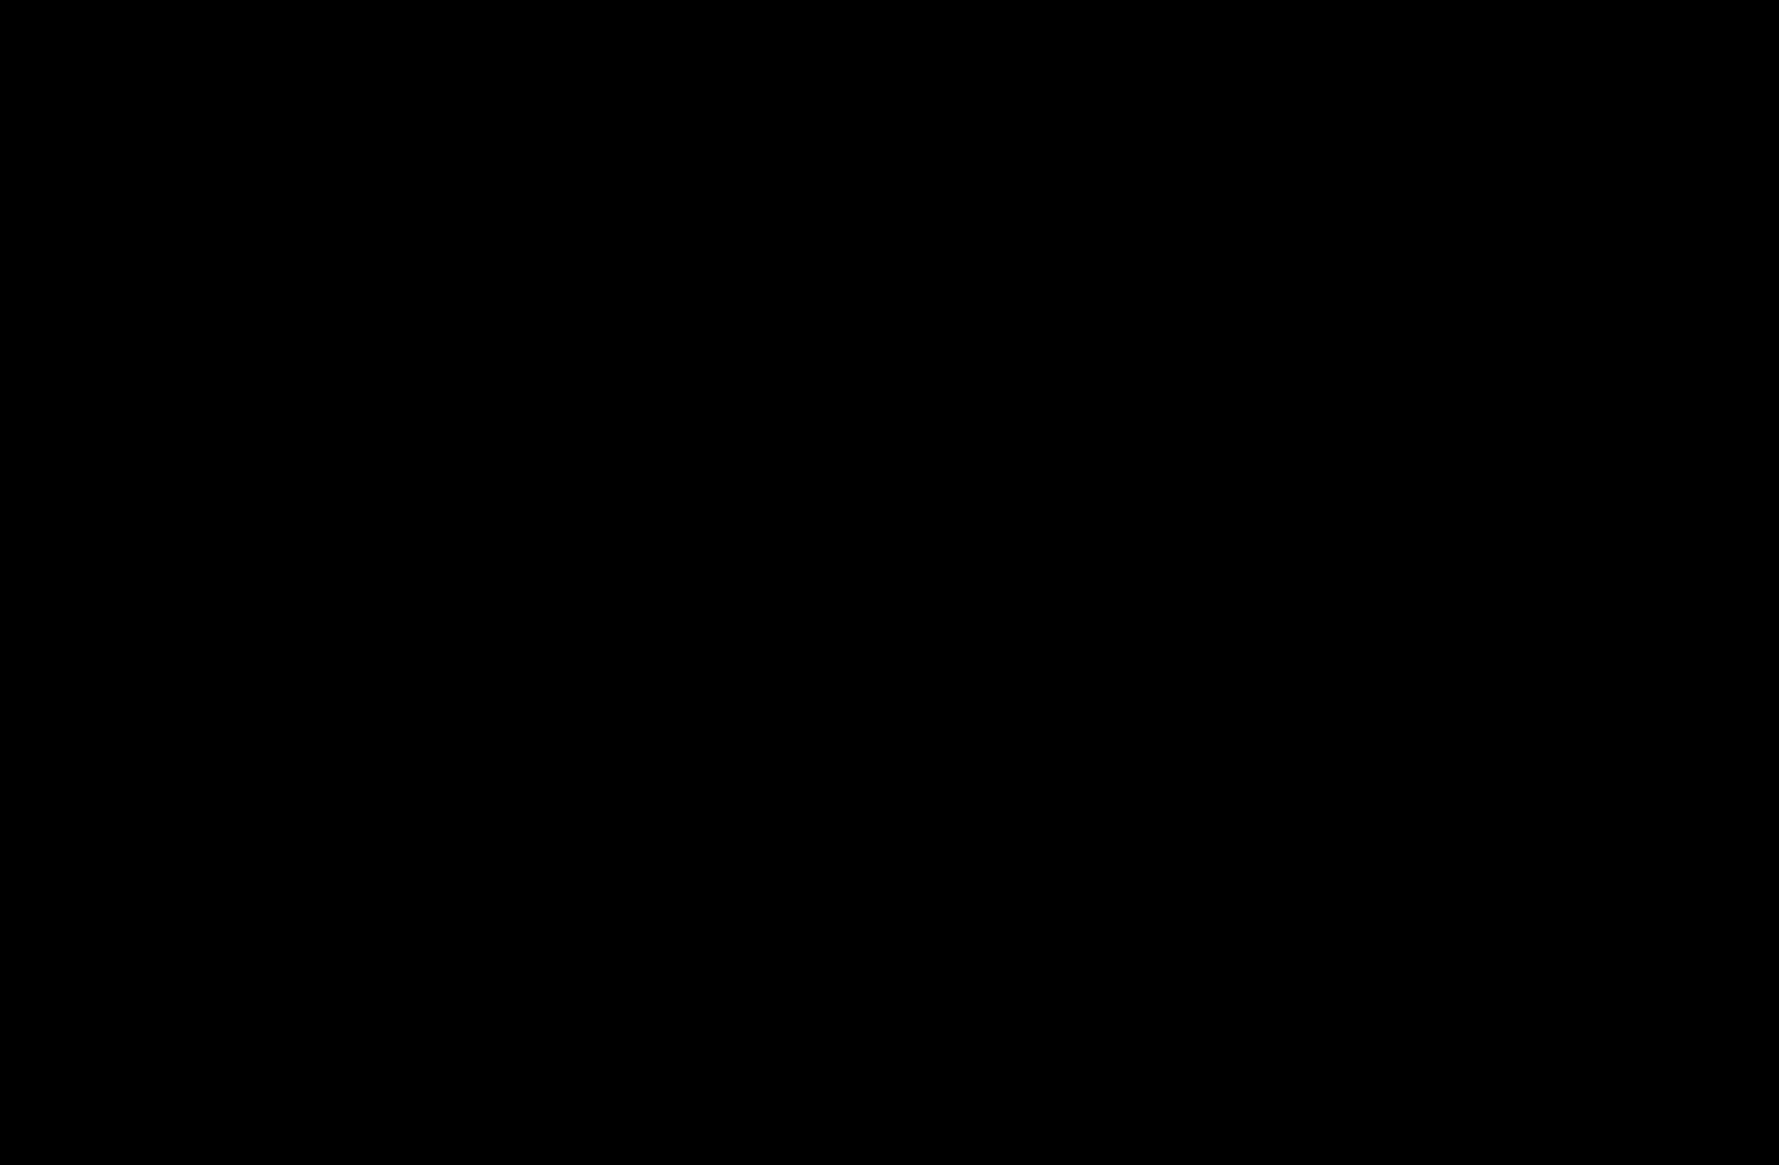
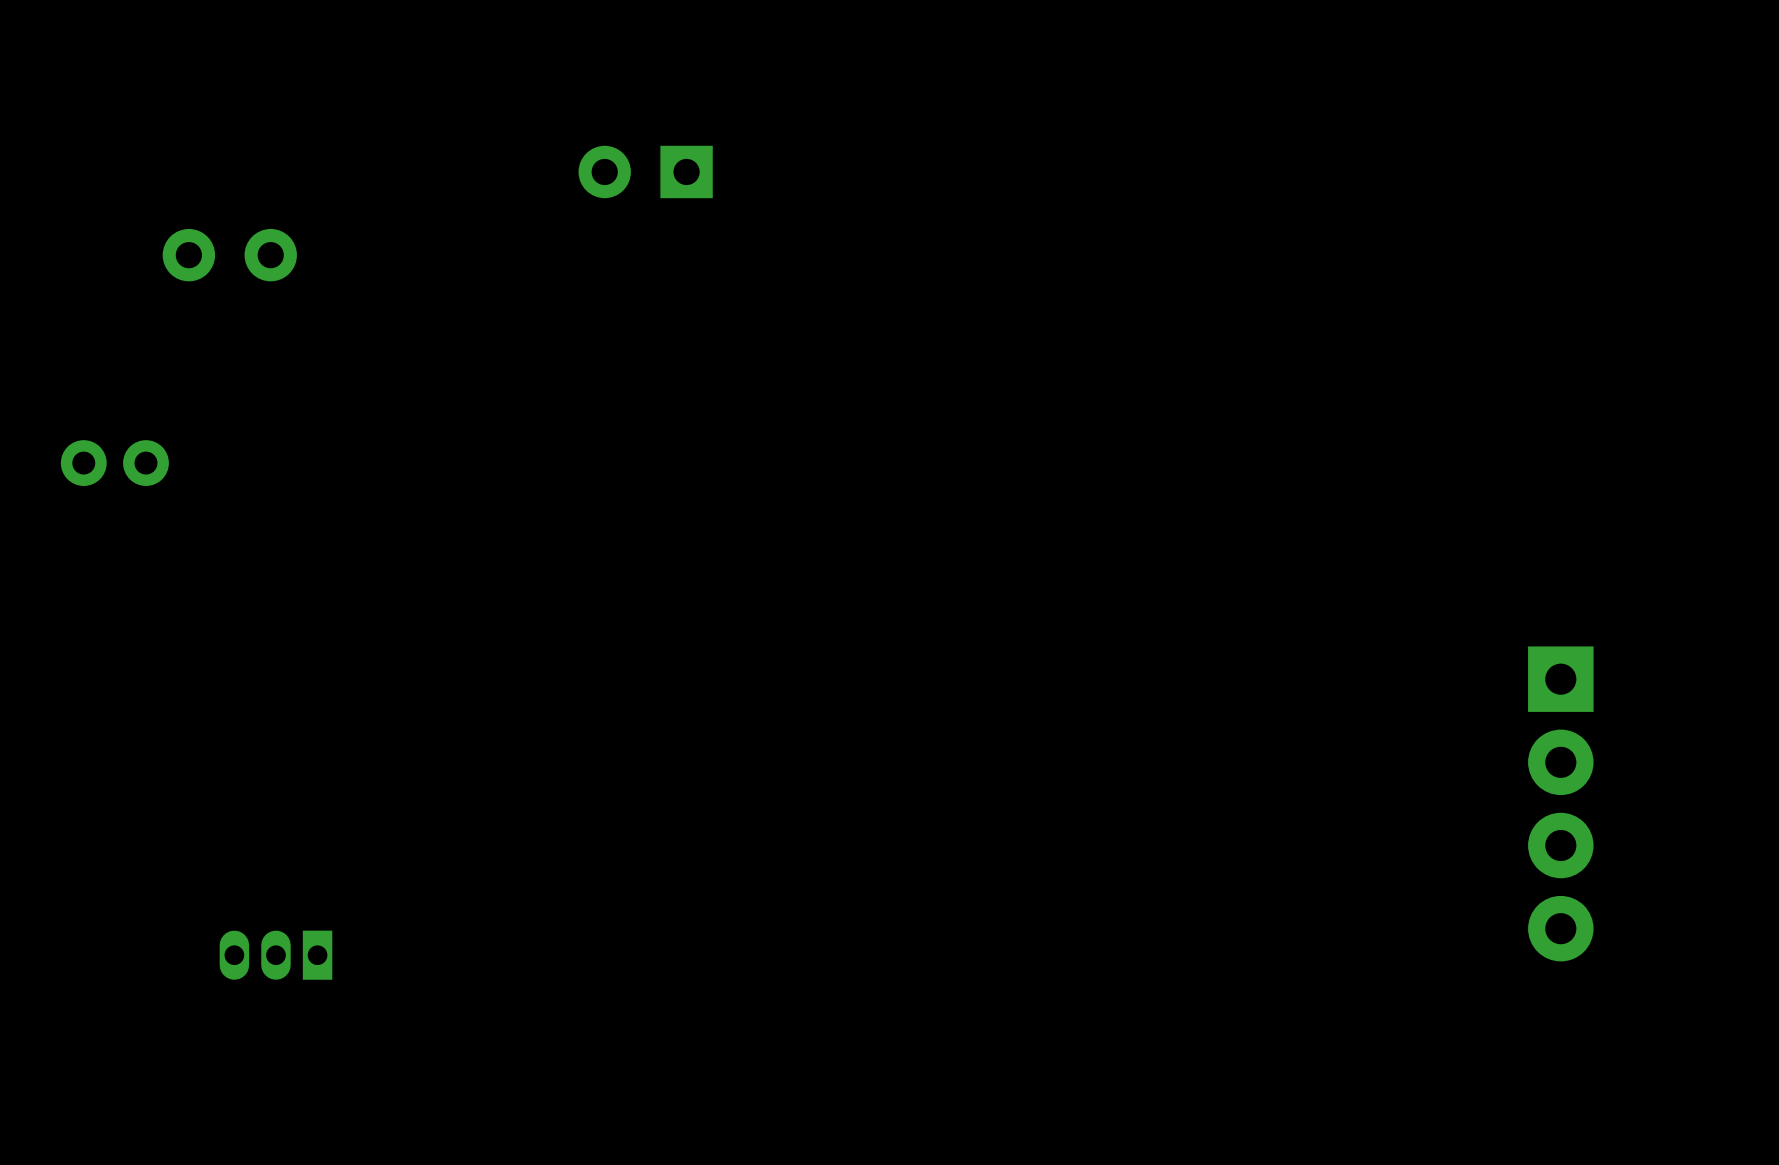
part: none -> (645, 171)
part: none -> (229, 255)
part: none -> (114, 463)
part: none -> (1560, 803)
part: none -> (275, 955)

